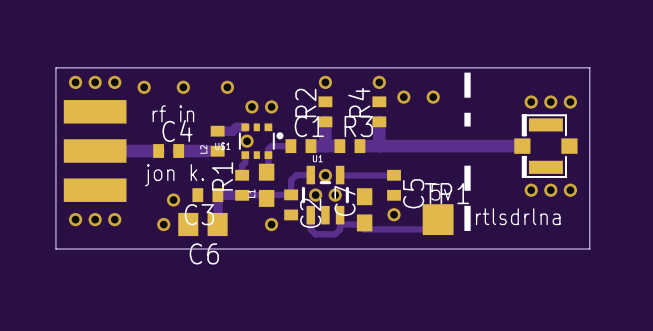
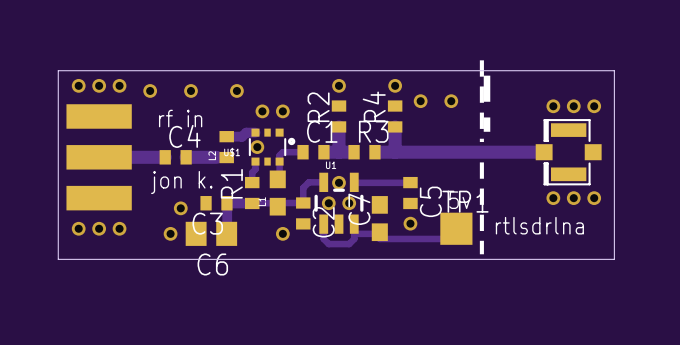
line: none -> (481, 162) (481, 254)
line: (467, 165) (467, 244) -> (481, 60) (481, 141)

